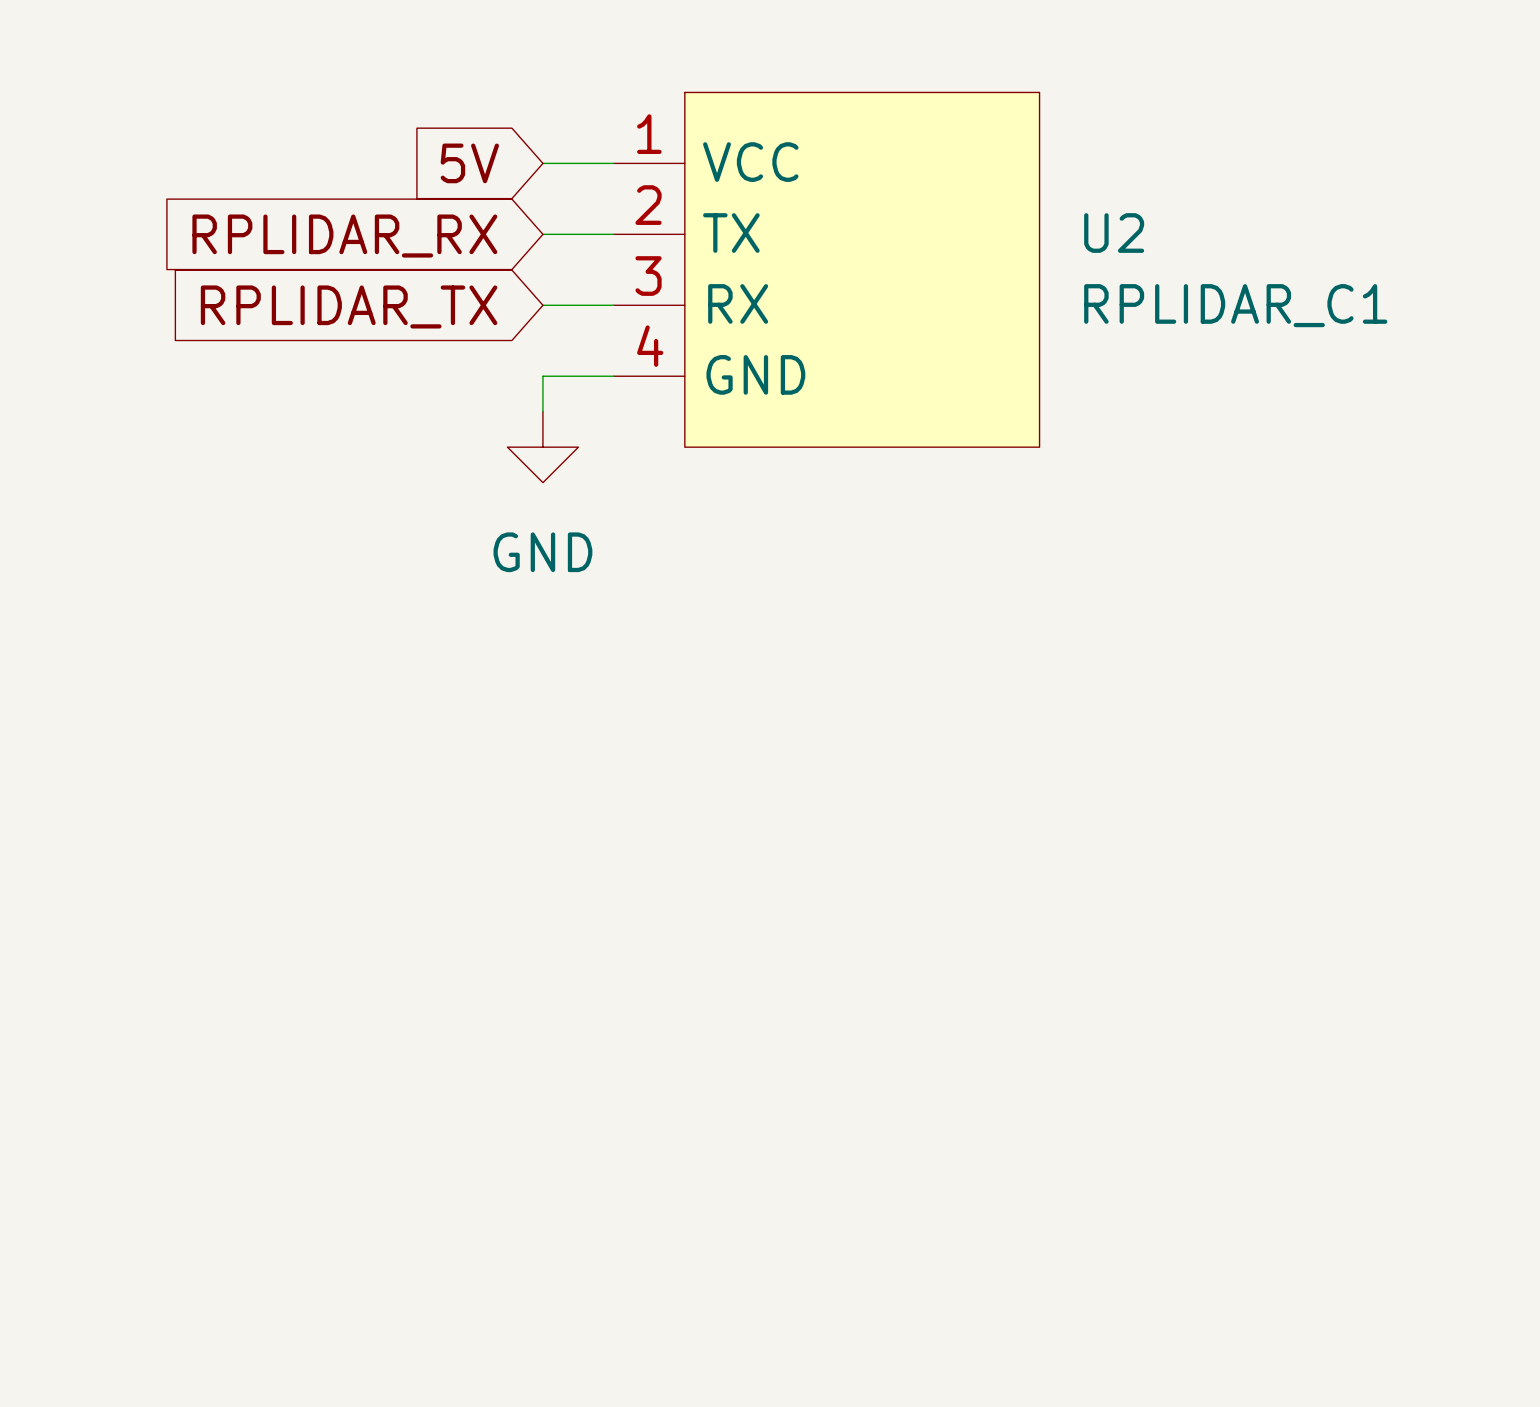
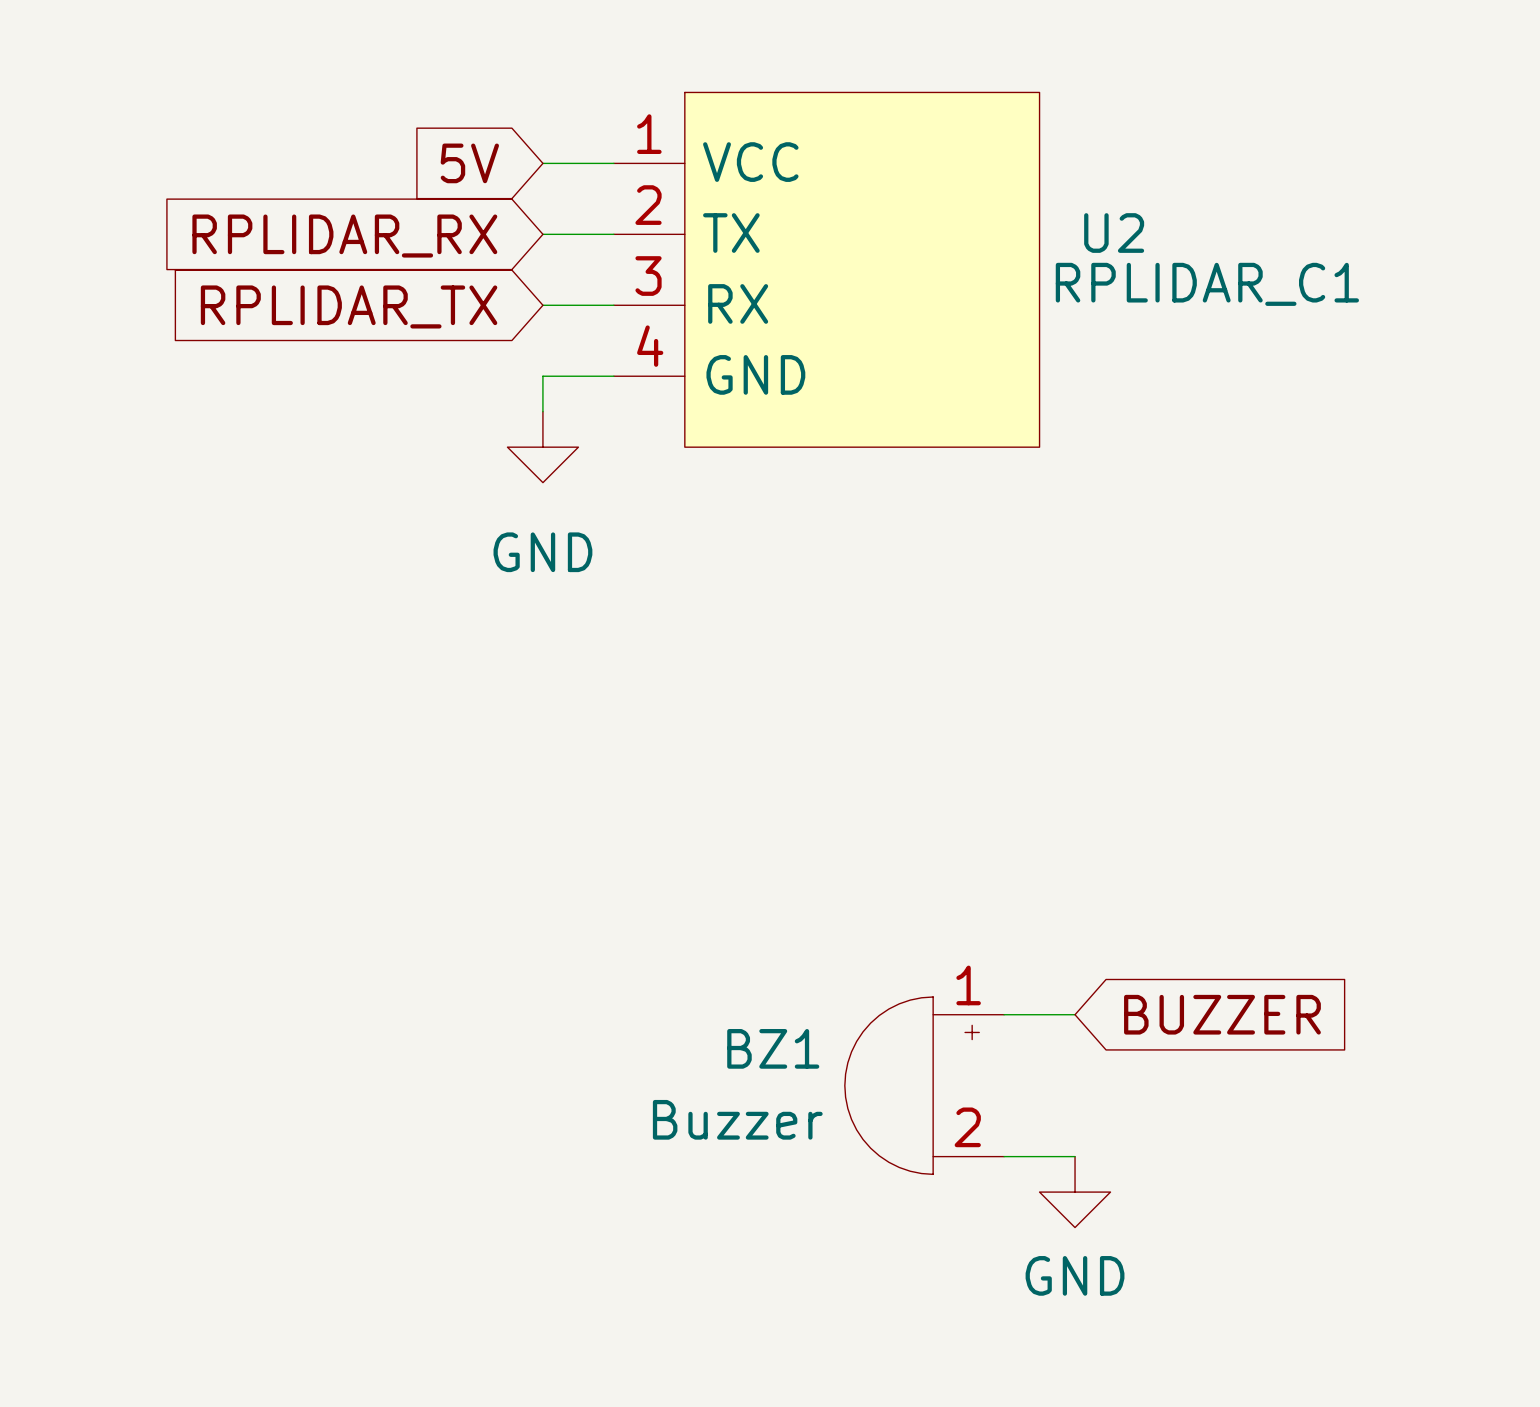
U2 value position: RPLIDAR_C1 (1235, 305) -> RPLIDAR_C1 (1207, 284)
wire: none -> (1004, 1014) (1075, 1014)
global label: none -> BUZZER (1222, 1014)
BZ1: none -> Buzzer (924, 1085)
wire: none -> (1004, 1156) (1075, 1156)
power symbol: none -> GND (1075, 1192)

